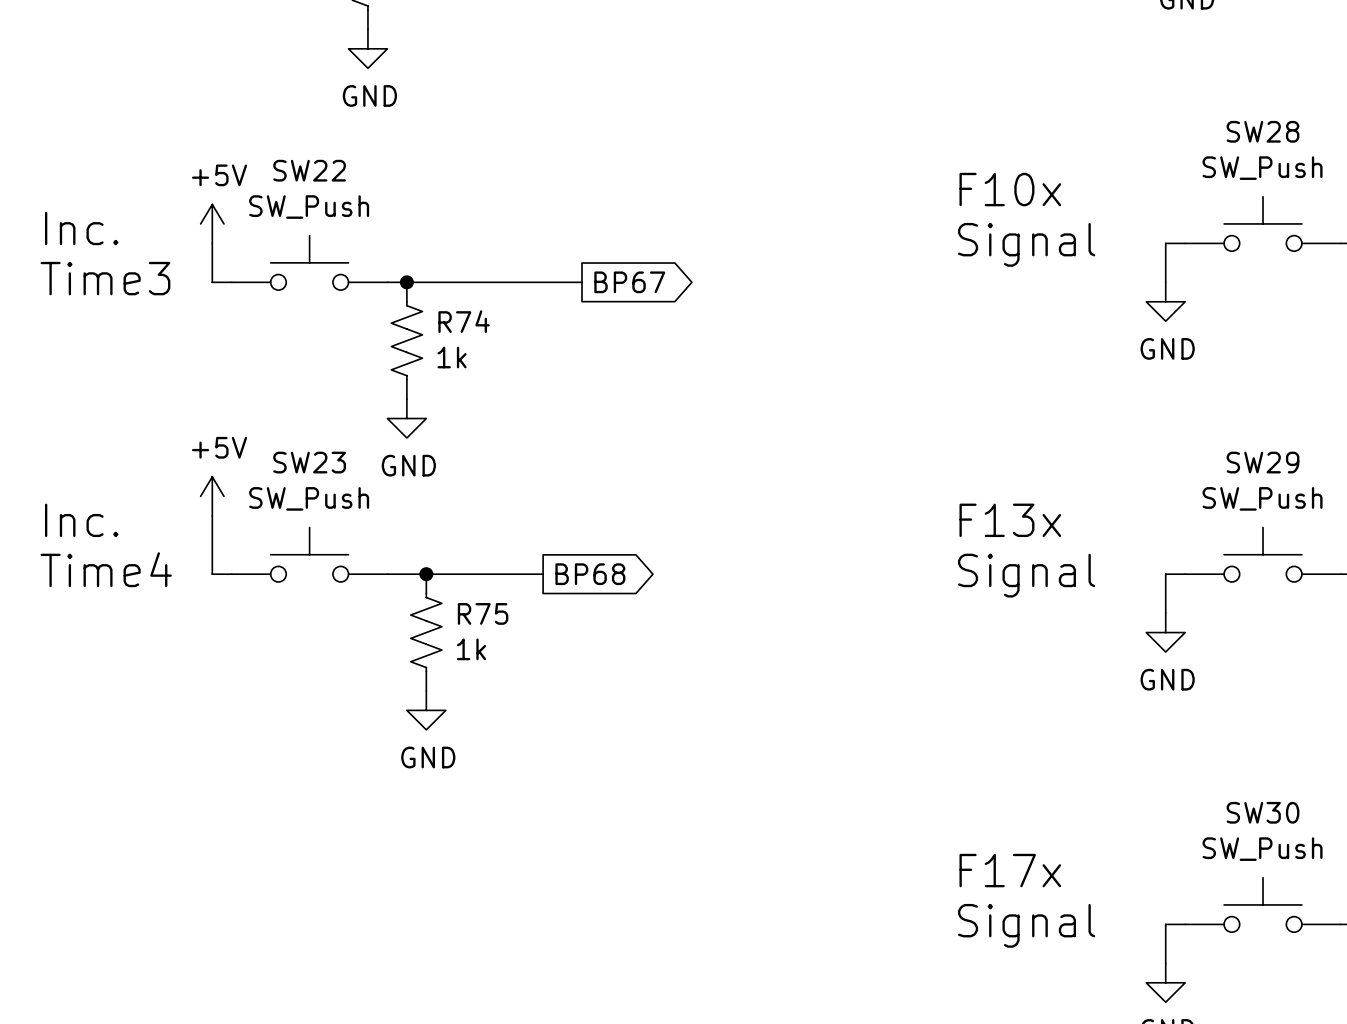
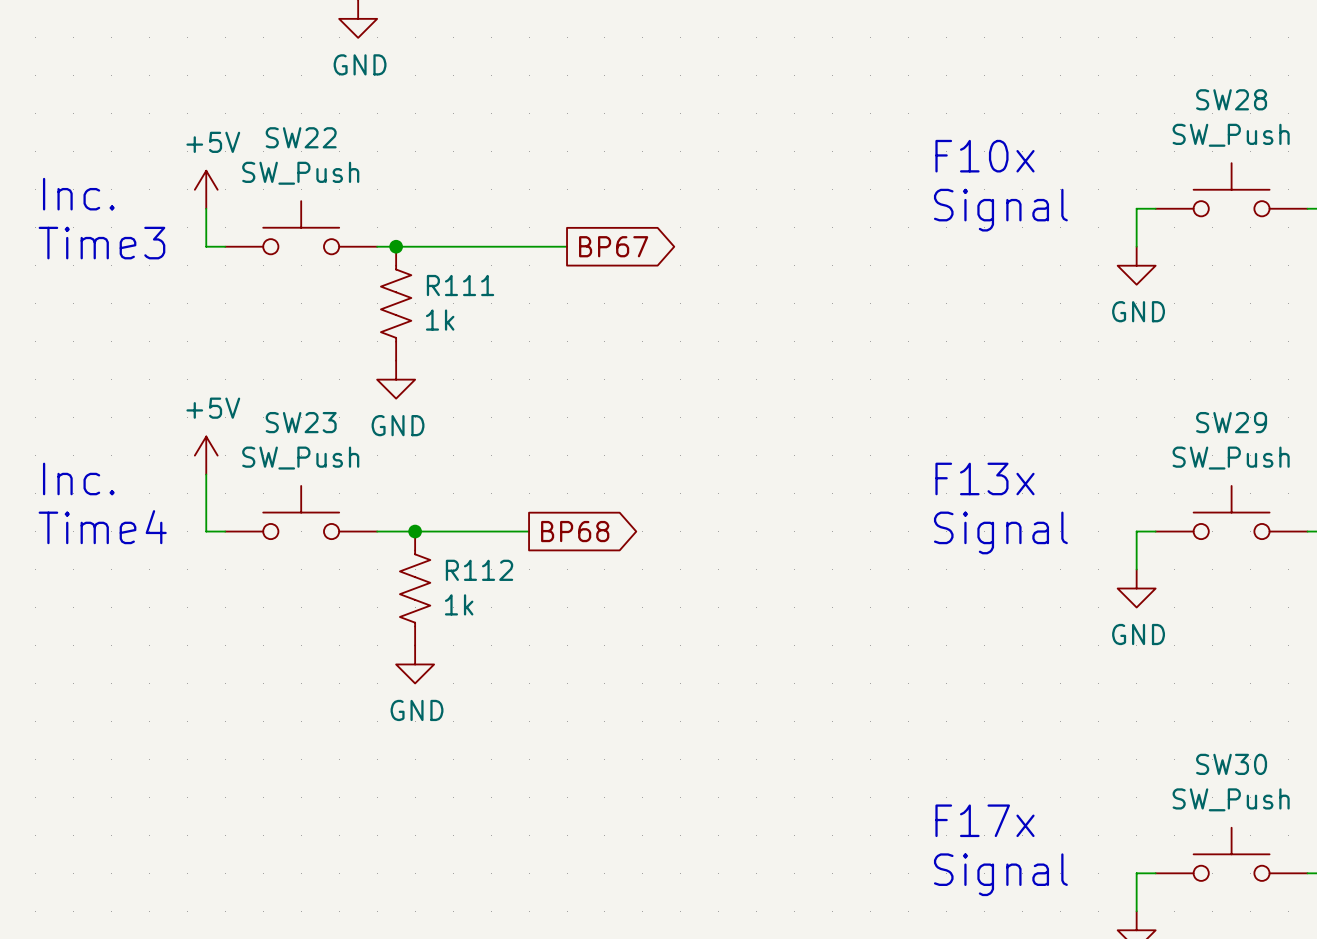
R74 name: R74 (464, 321) -> R111 (460, 285)
R75 name: R75 (483, 613) -> R112 (479, 570)

